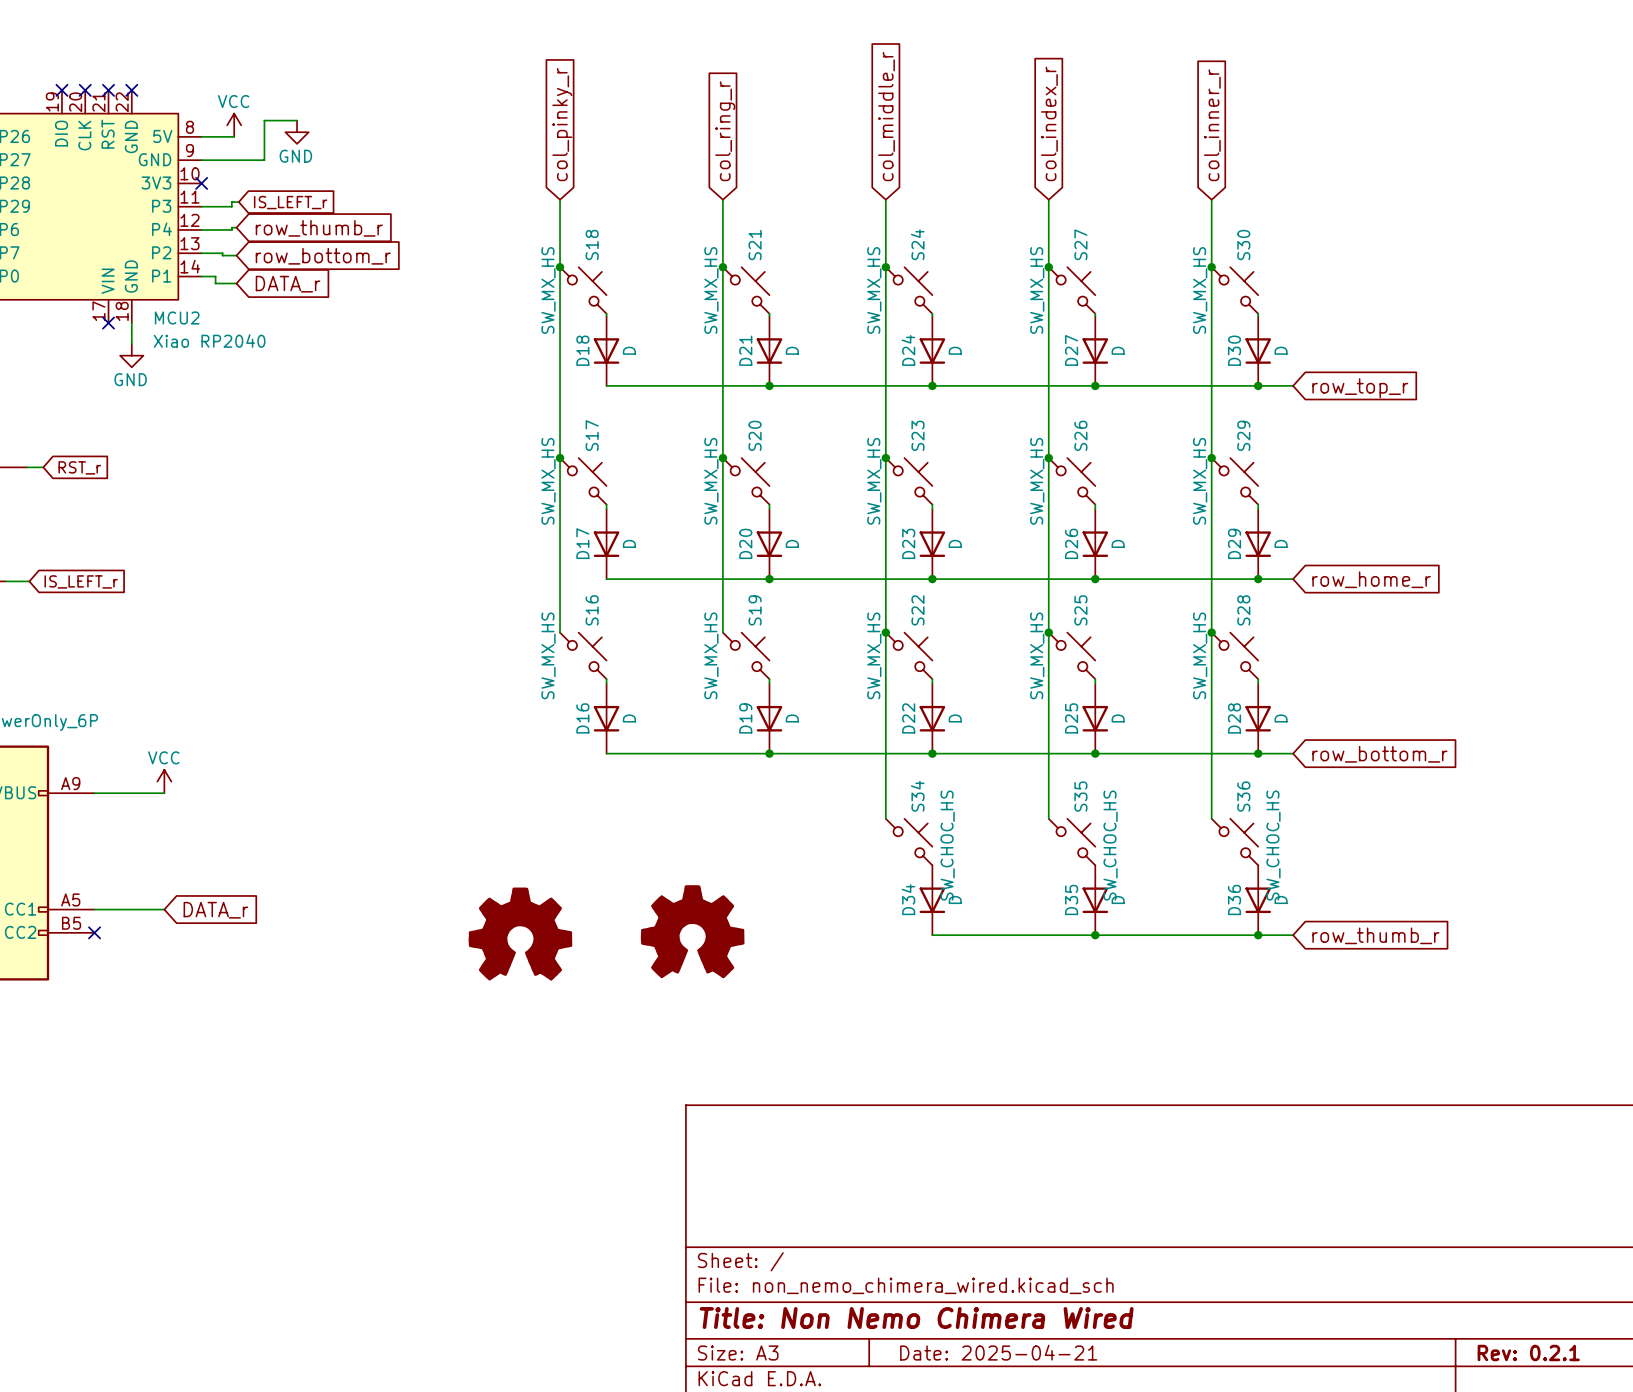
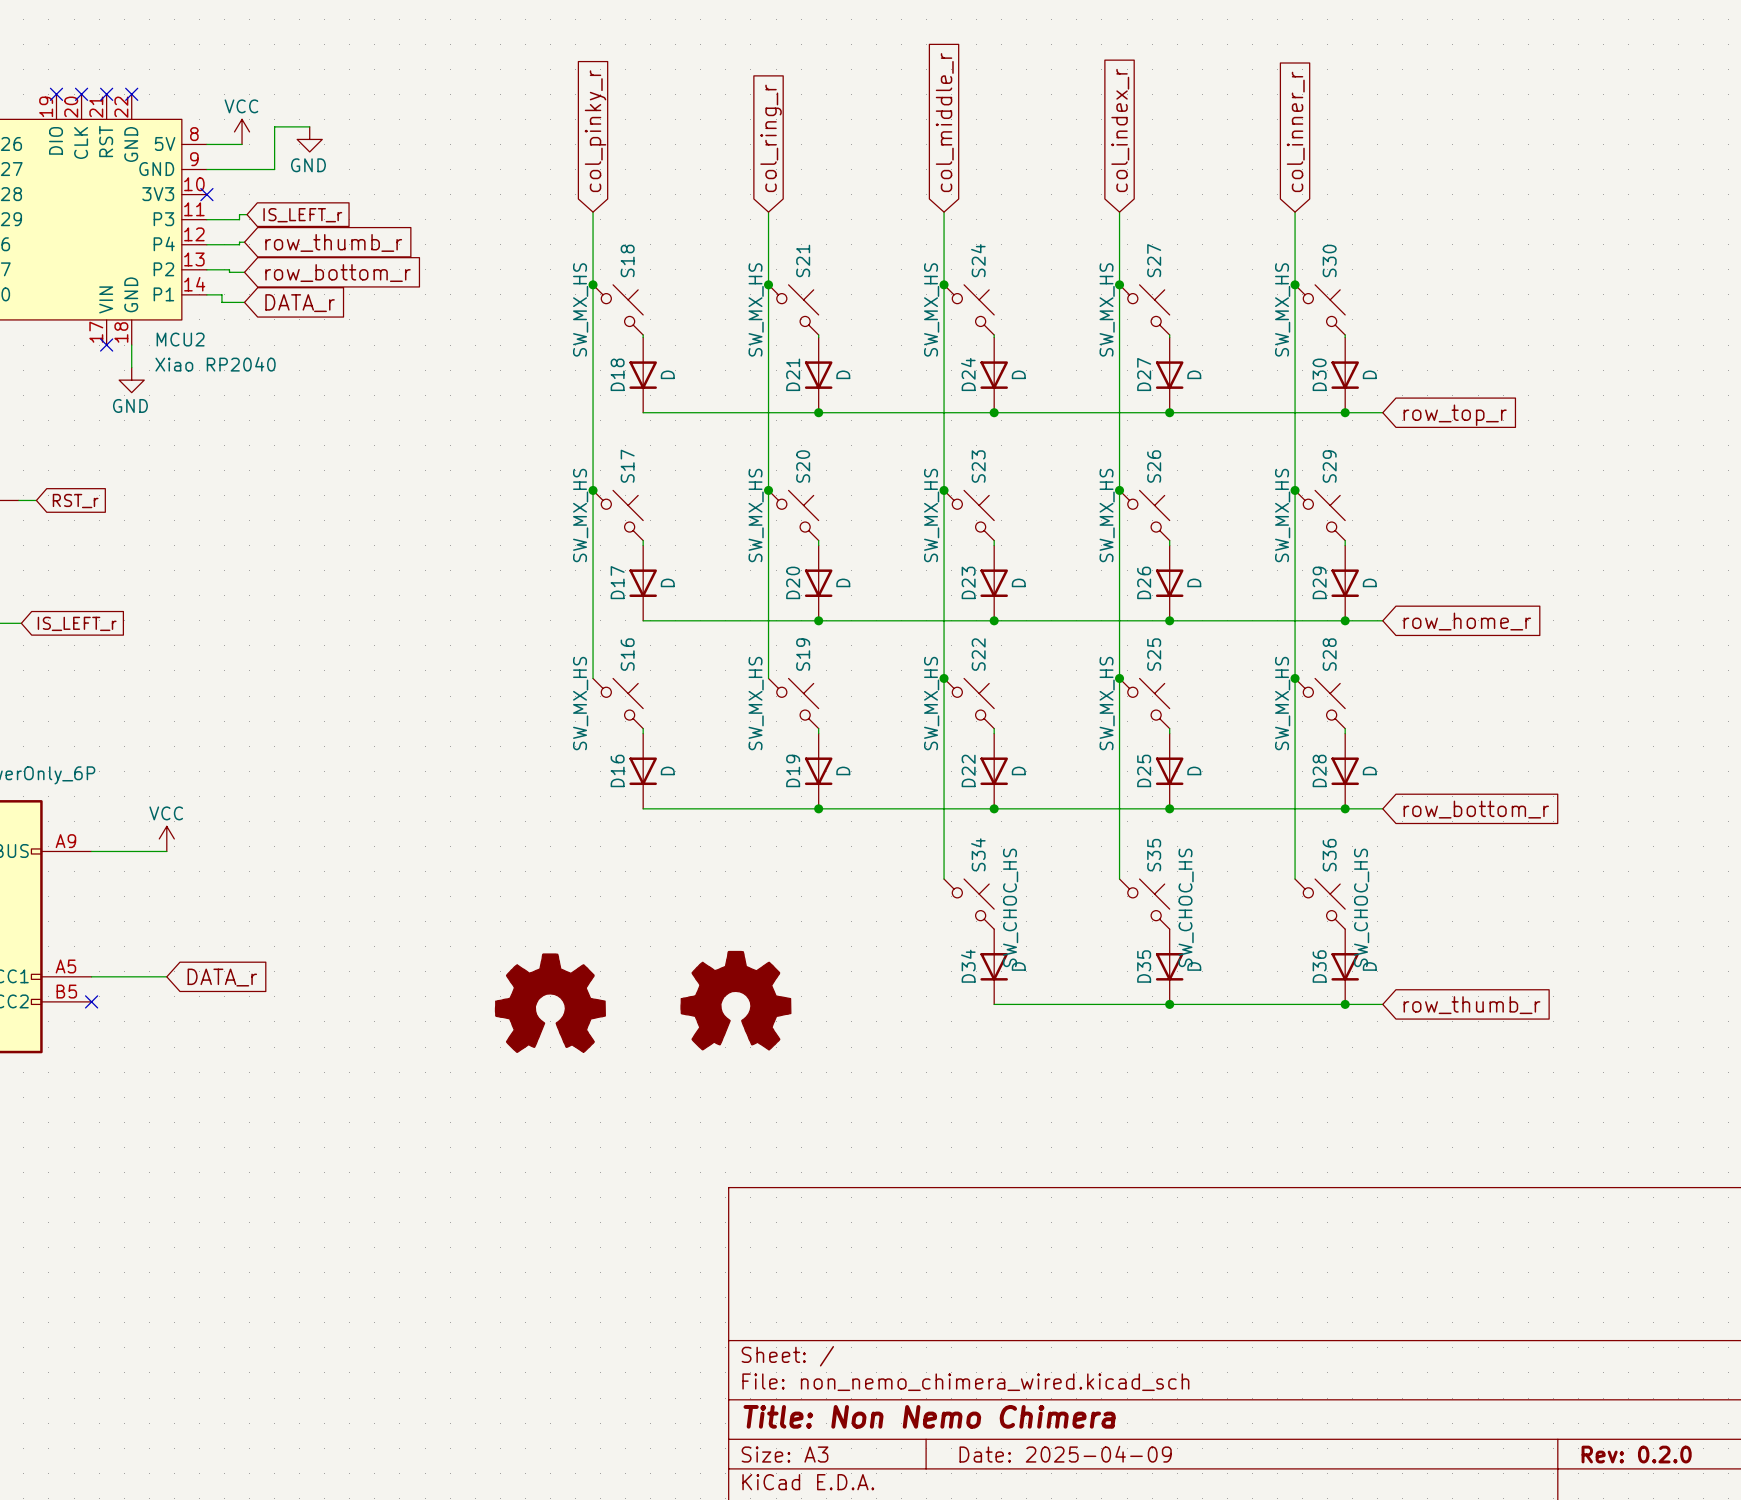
title block: Title: Non Nemo Chimera Wired (916, 1318) -> Title: Non Nemo Chimera (929, 1416)
title block: Date: 2025-04-21 (998, 1352) -> Date: 2025-04-09 (1065, 1454)
title block: Rev: 0.2.1 (1528, 1353) -> Rev: 0.2.0 (1636, 1454)

